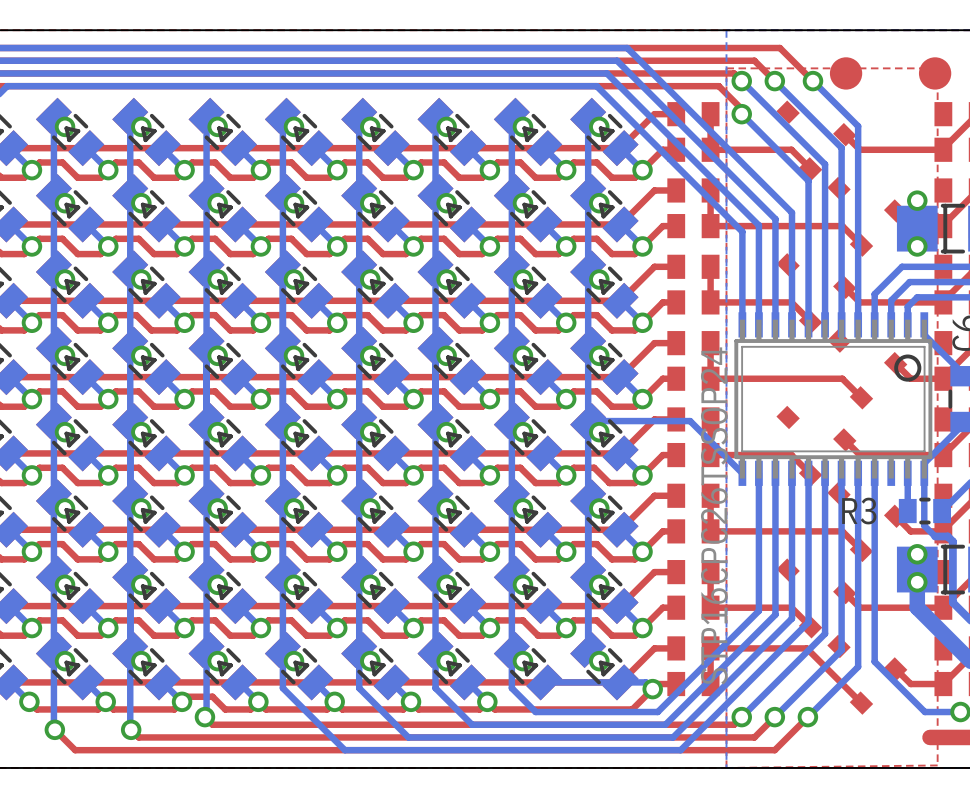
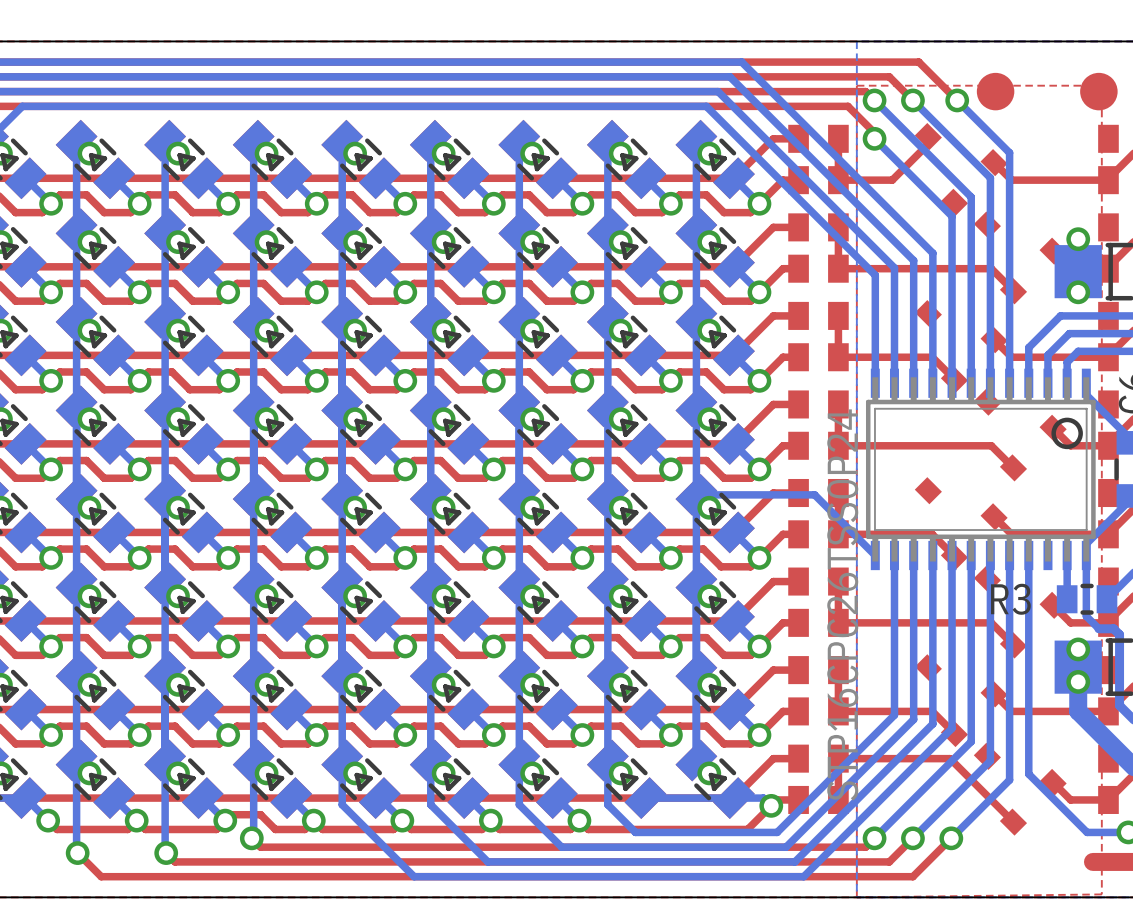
top track: (757, 149) (791, 149) (810, 168) -> (892, 180) (928, 144) (928, 136)

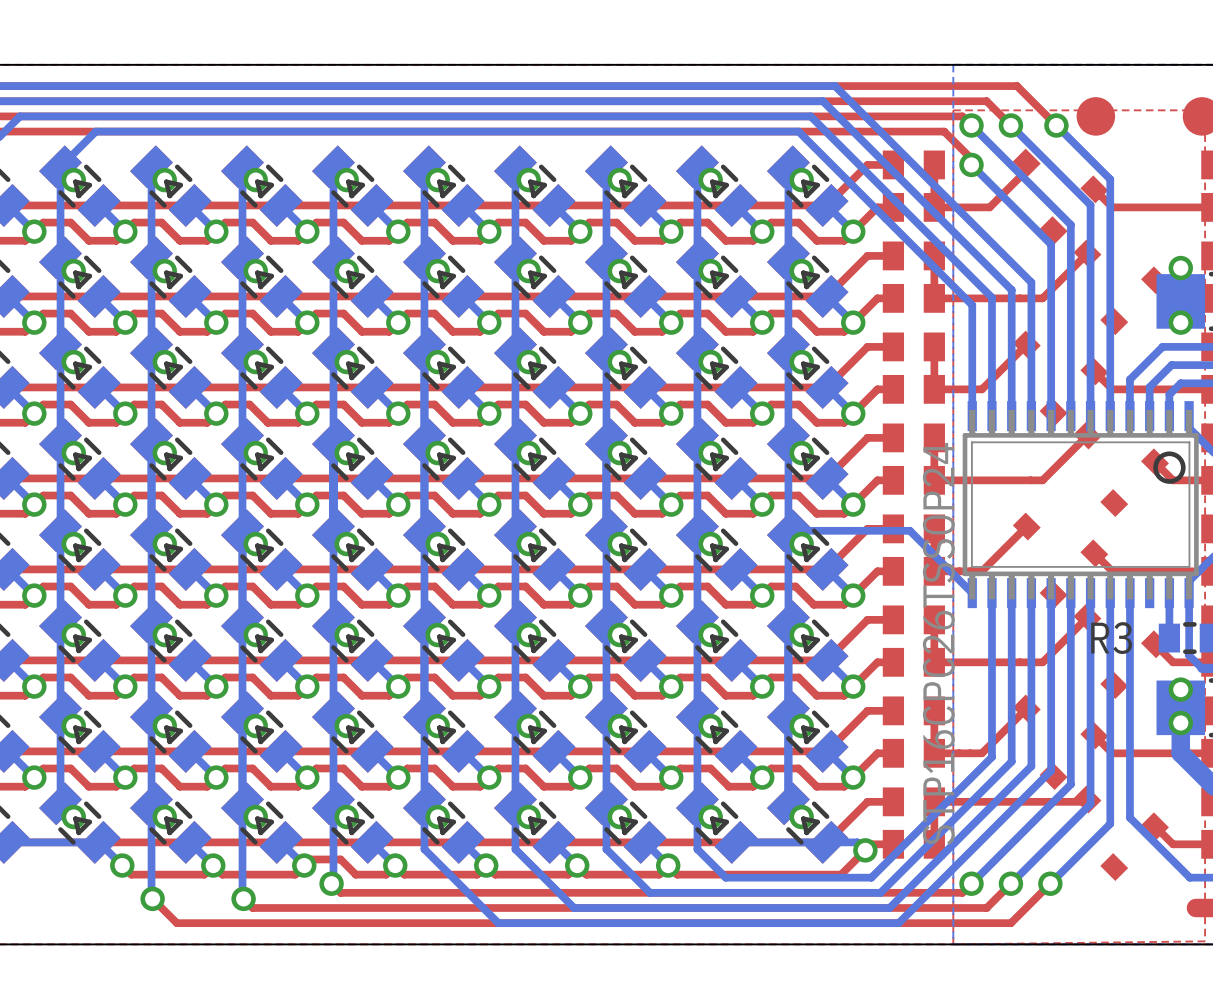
top track: (943, 268) (991, 268) (1013, 290) -> (1042, 298) (1087, 253)
top track: (884, 357) (932, 357) (954, 379) -> (981, 389) (1026, 344)
top track: (943, 445) (991, 445) (1013, 467) -> (1042, 480) (1087, 435)
top track: (884, 534) (932, 534) (954, 556) -> (981, 571) (1026, 526)
top track: (943, 622) (991, 622) (1013, 644) -> (1042, 662) (1087, 617)
top track: (884, 711) (932, 711) (954, 733) -> (981, 753) (1026, 708)
top track: (950, 758) (1013, 822) -> (1049, 801) (1085, 801) (1087, 799)

